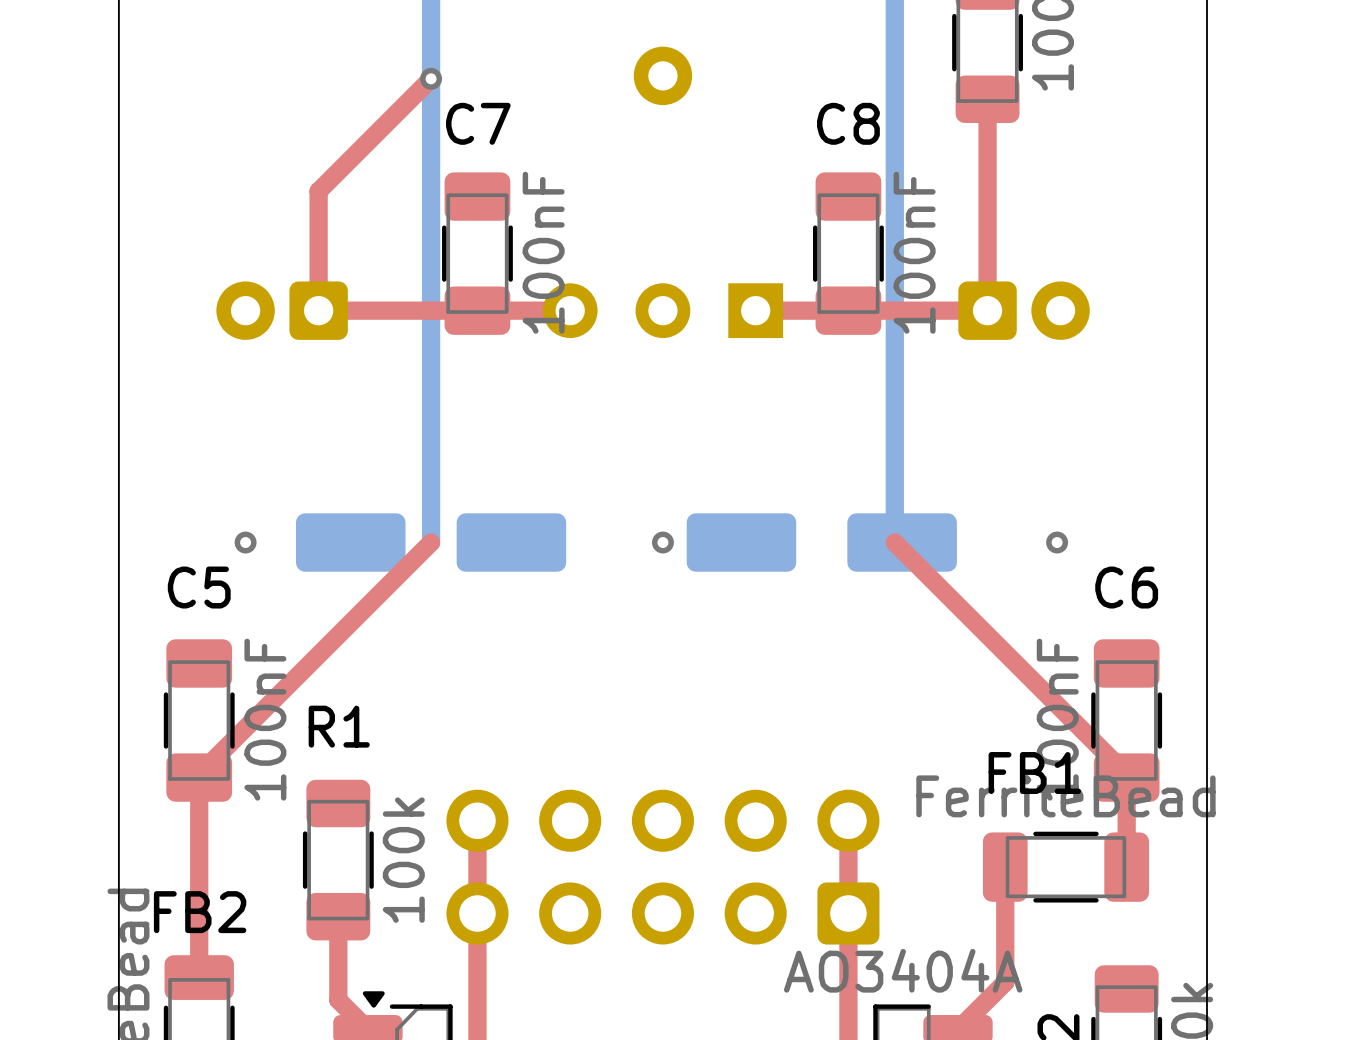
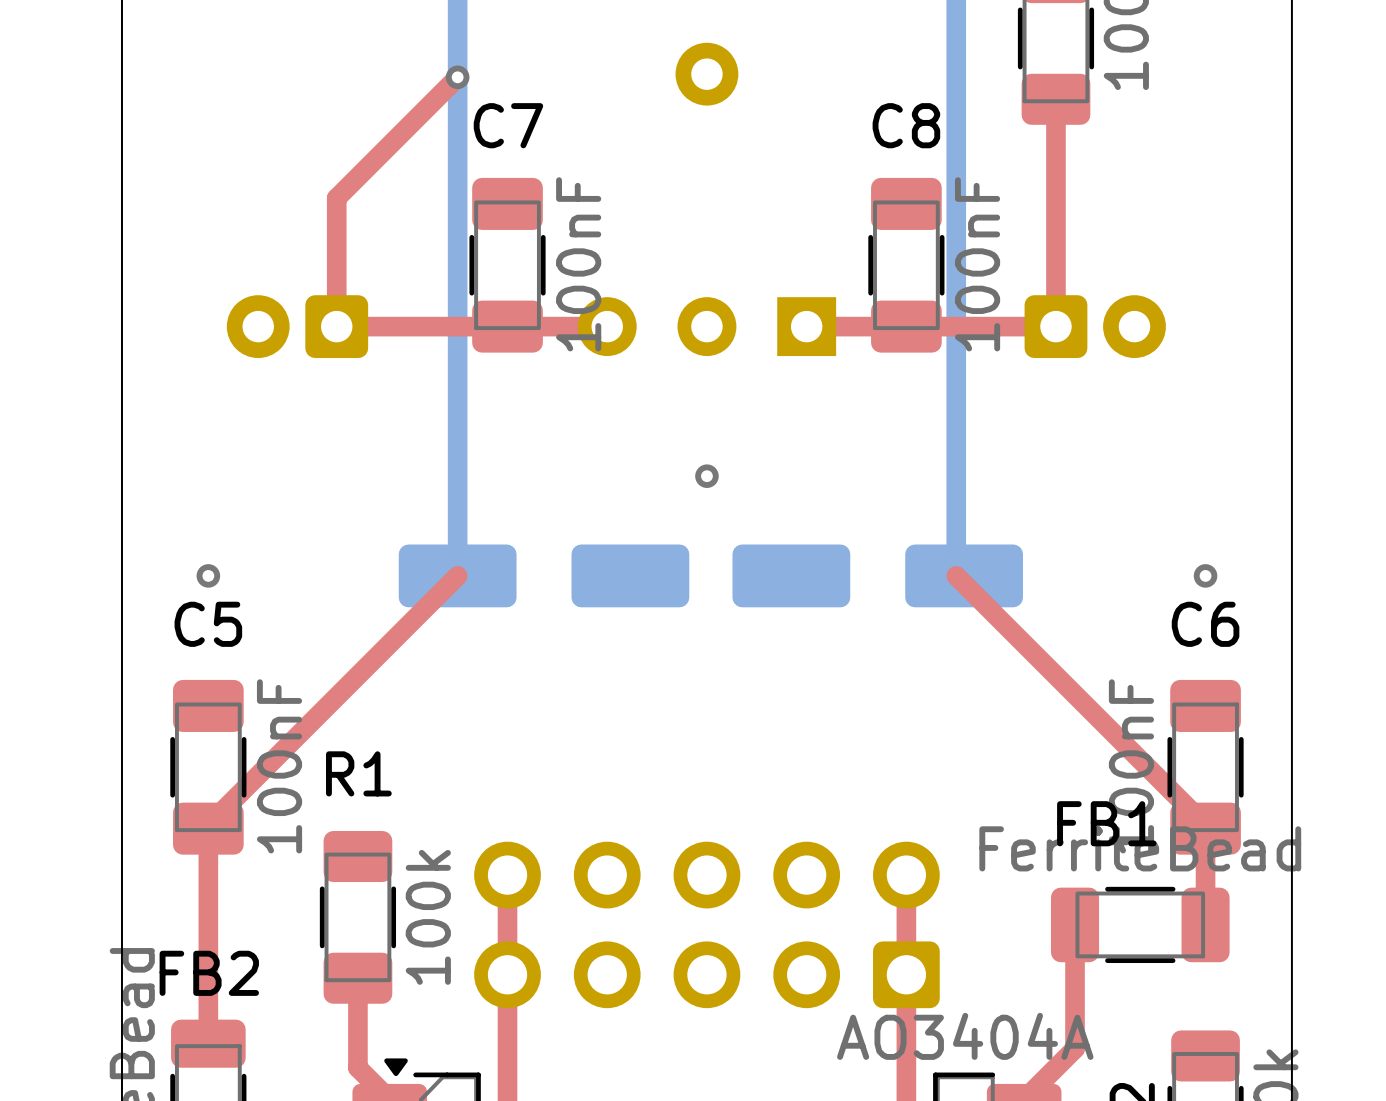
via position: (245, 542) -> (208, 575)
part position: (431, 542) -> (544, 575)
via position: (662, 542) -> (706, 476)
via position: (1057, 542) -> (1205, 575)

